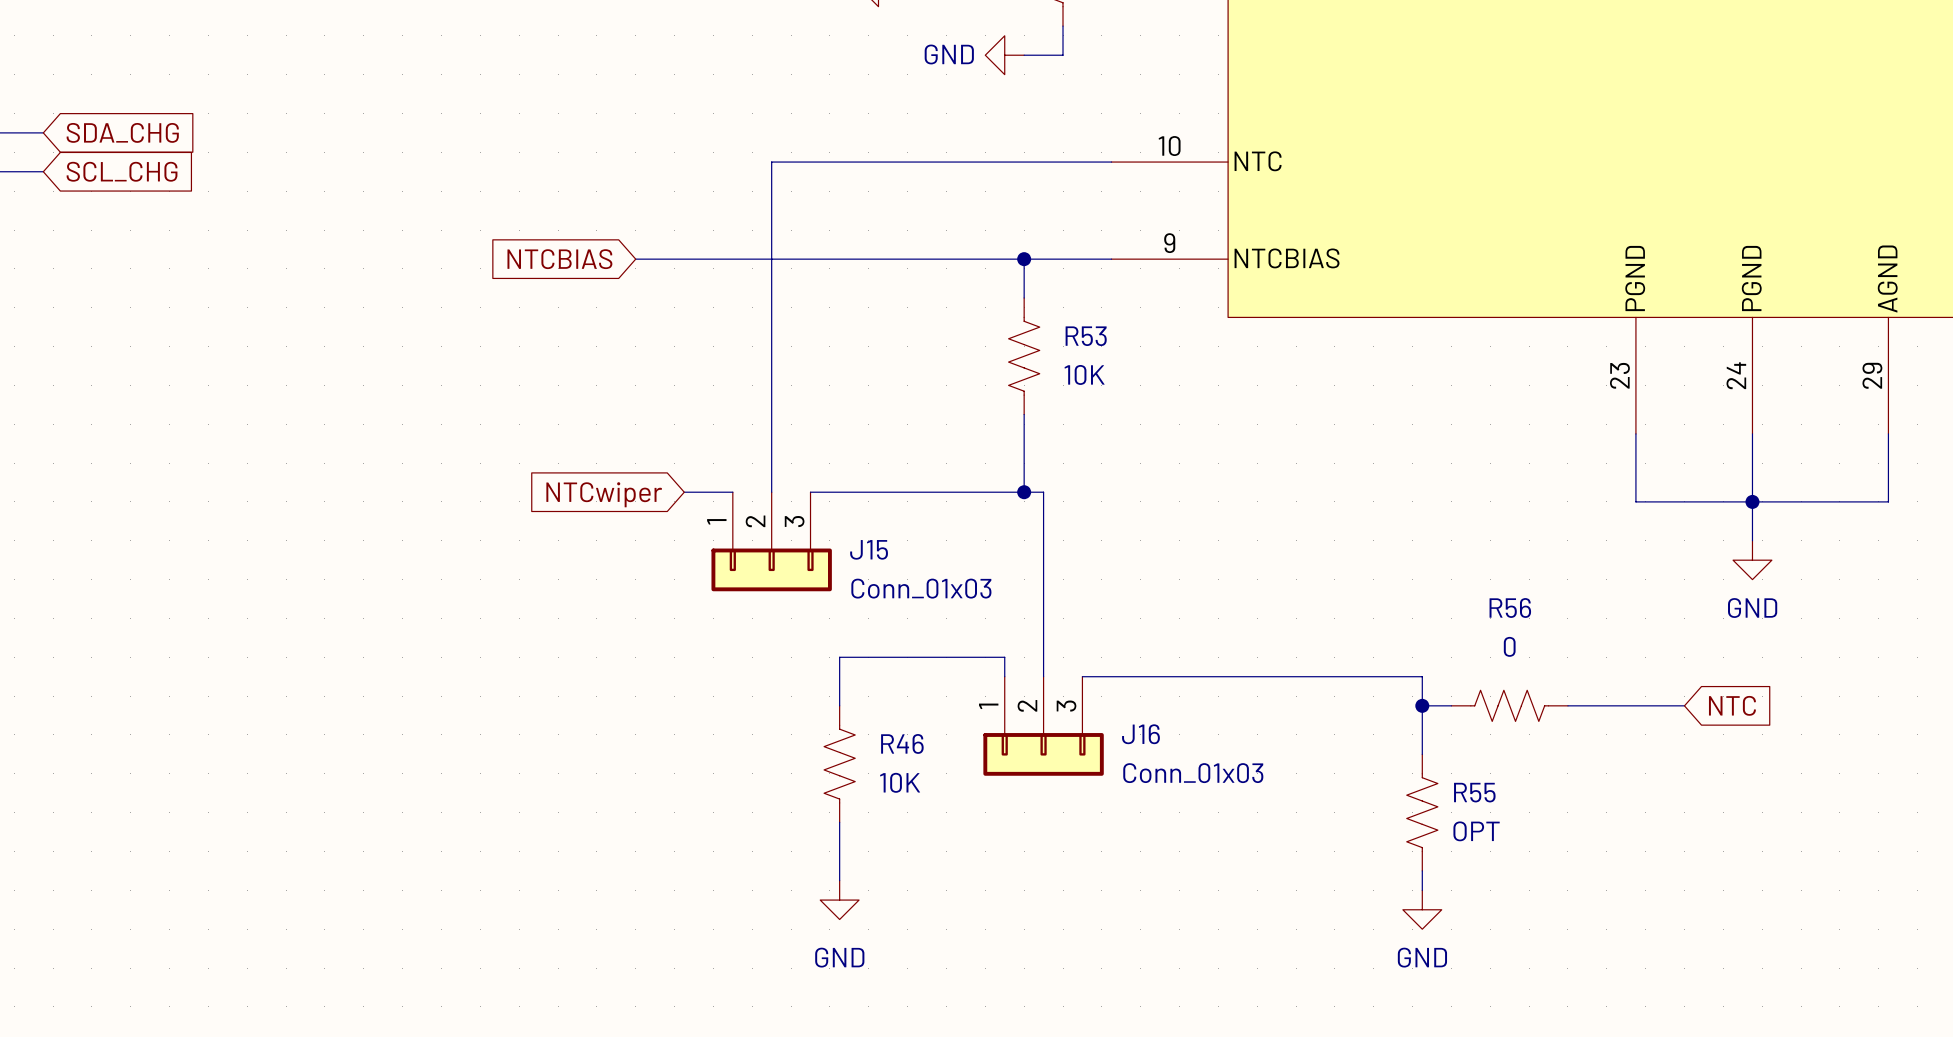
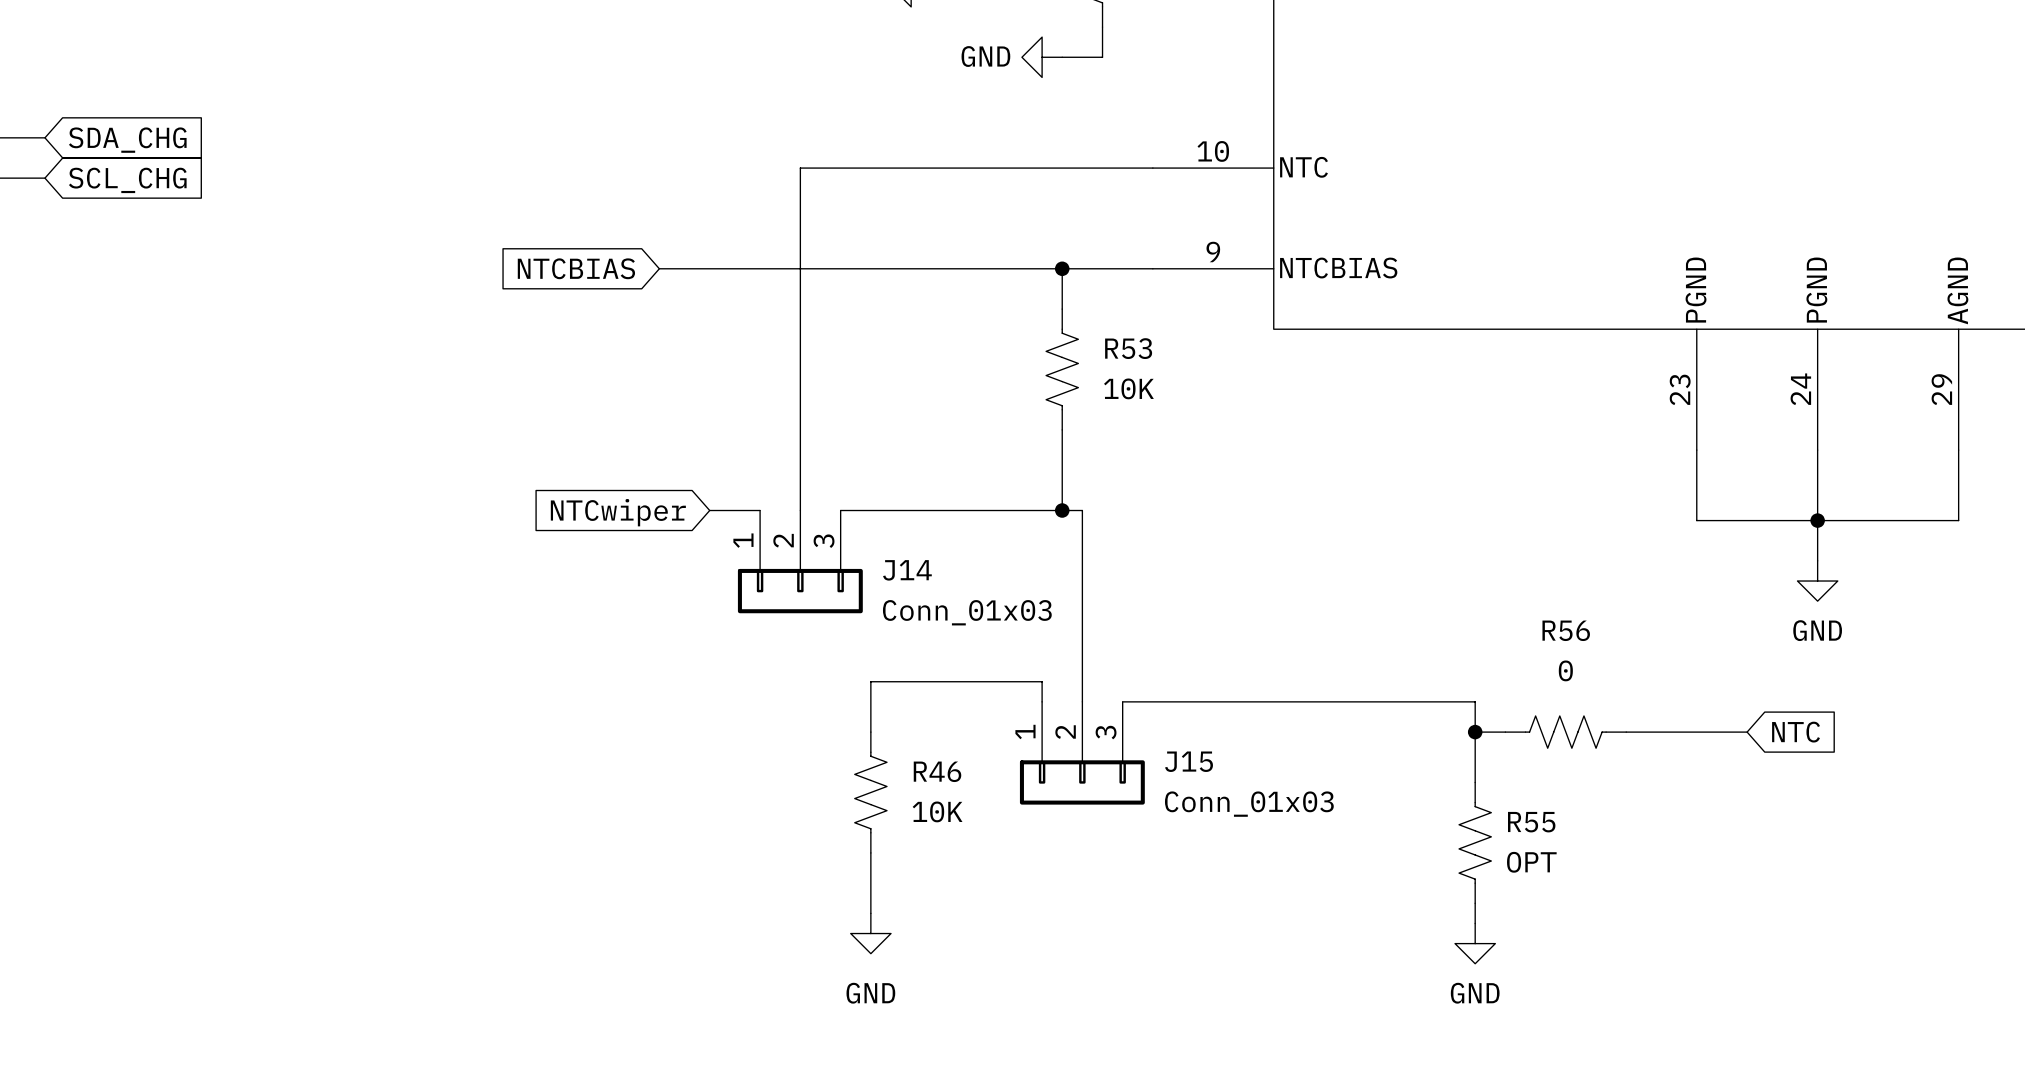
J15 name: J15 (869, 549) -> J14 (907, 570)
J16 name: J16 (1140, 734) -> J15 (1189, 761)

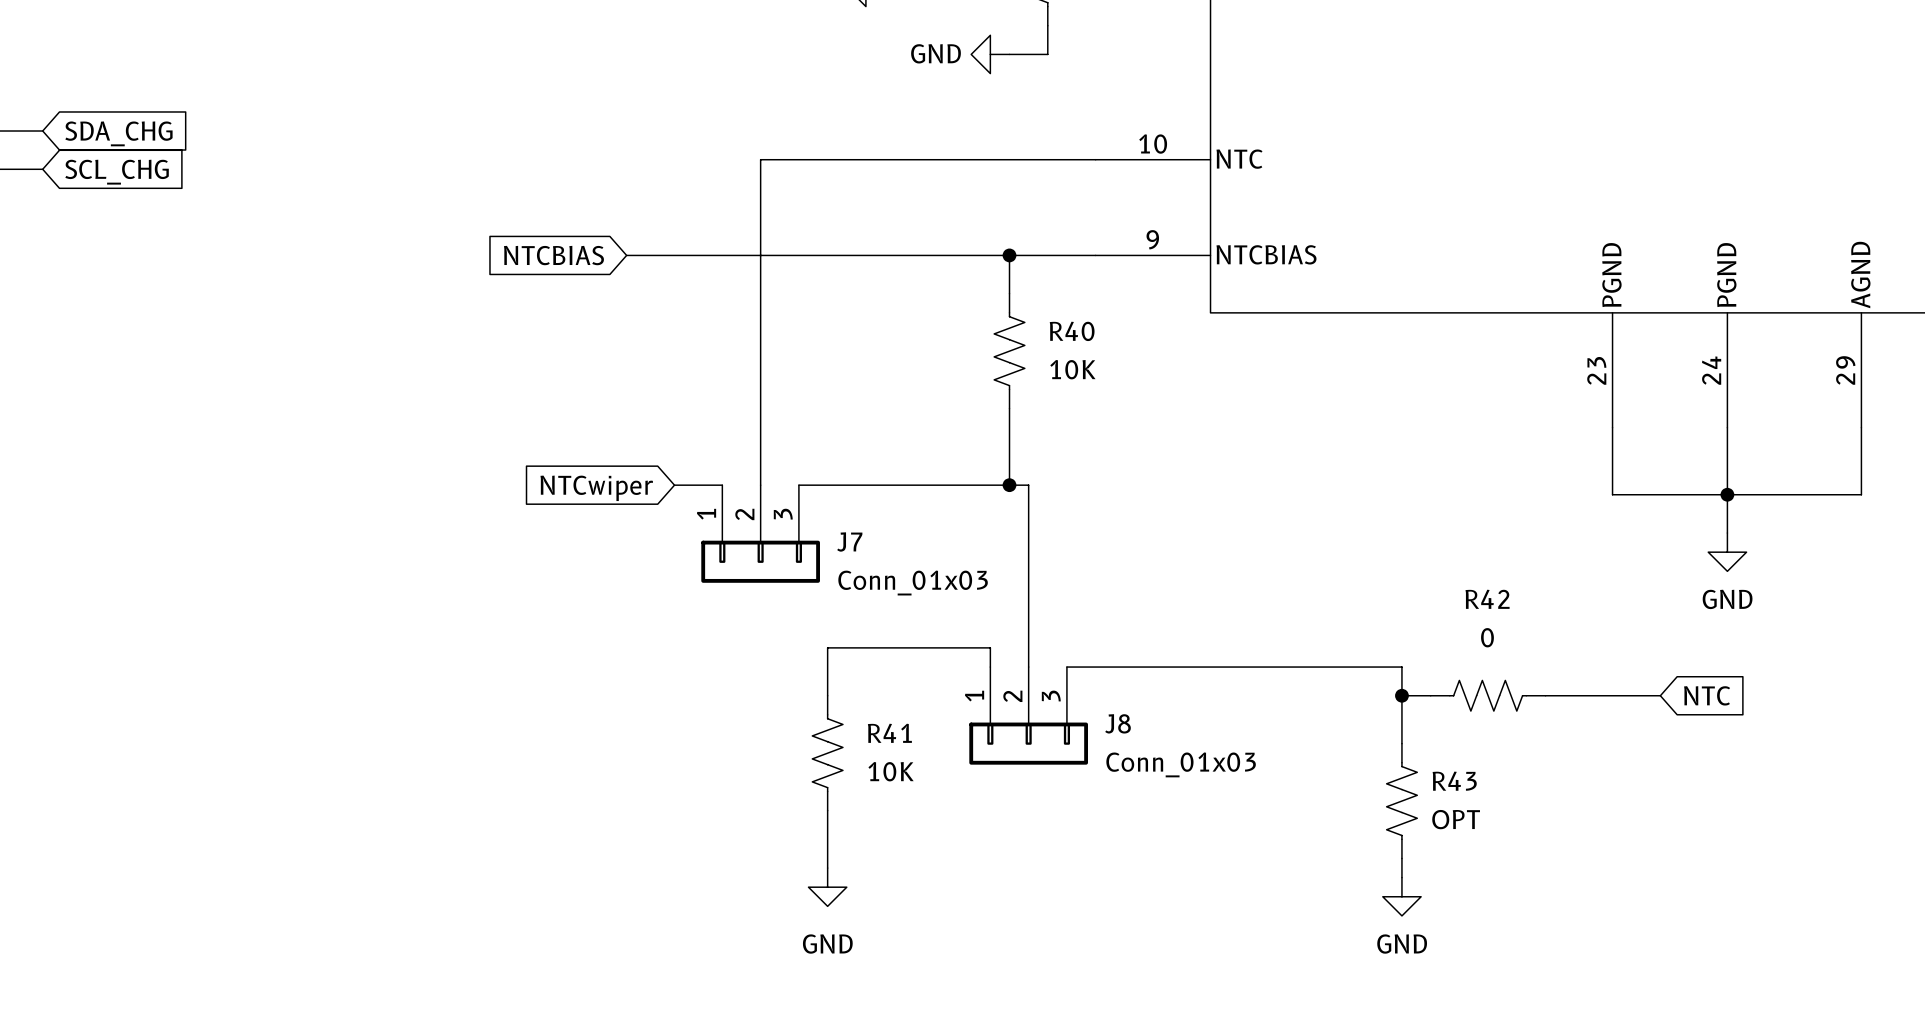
R53 name: R53 (1128, 348) -> R40 (1072, 331)
J14 name: J14 (907, 570) -> J7 (849, 541)
R56 name: R56 (1566, 630) -> R42 (1487, 599)
J15 name: J15 (1189, 761) -> J8 (1118, 723)
R46 name: R46 (937, 771) -> R41 (889, 733)
R55 name: R55 (1531, 822) -> R43 (1454, 781)

